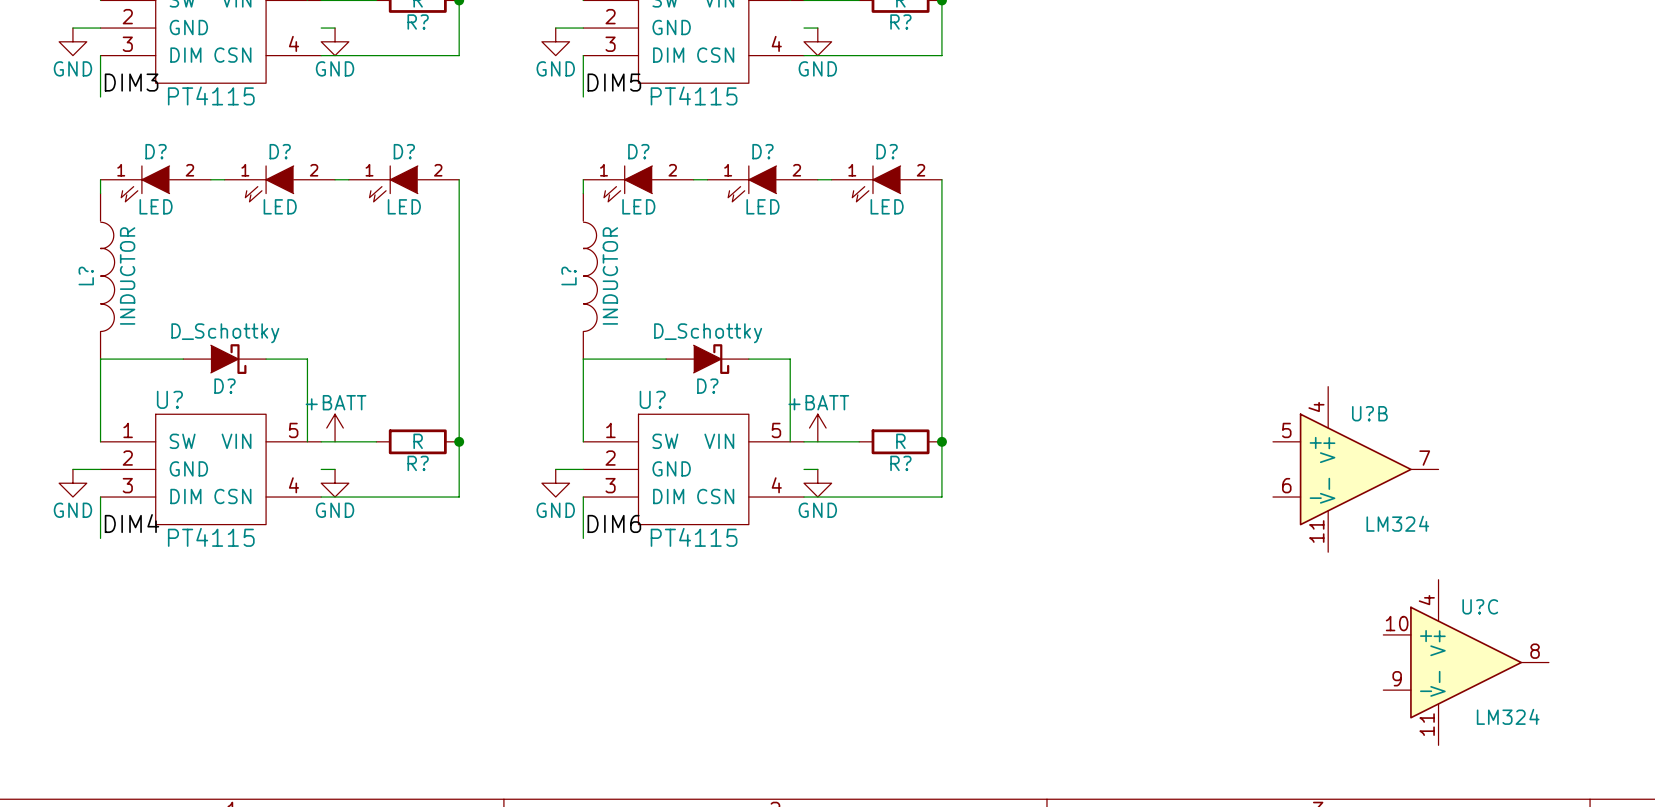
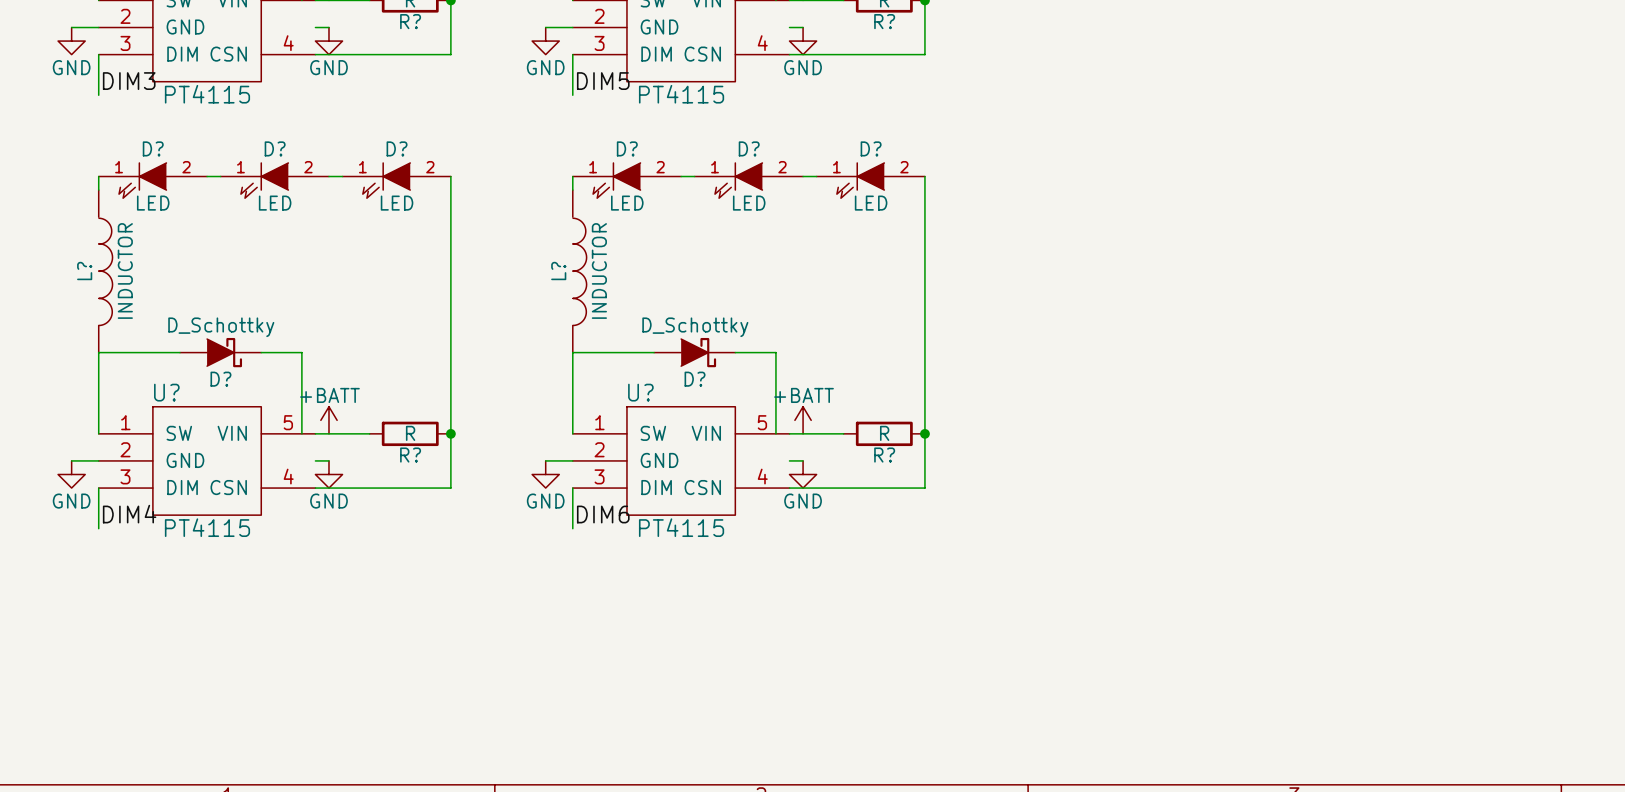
U?B: LM324 (1355, 469) -> none
U?C: LM324 (1466, 662) -> none

